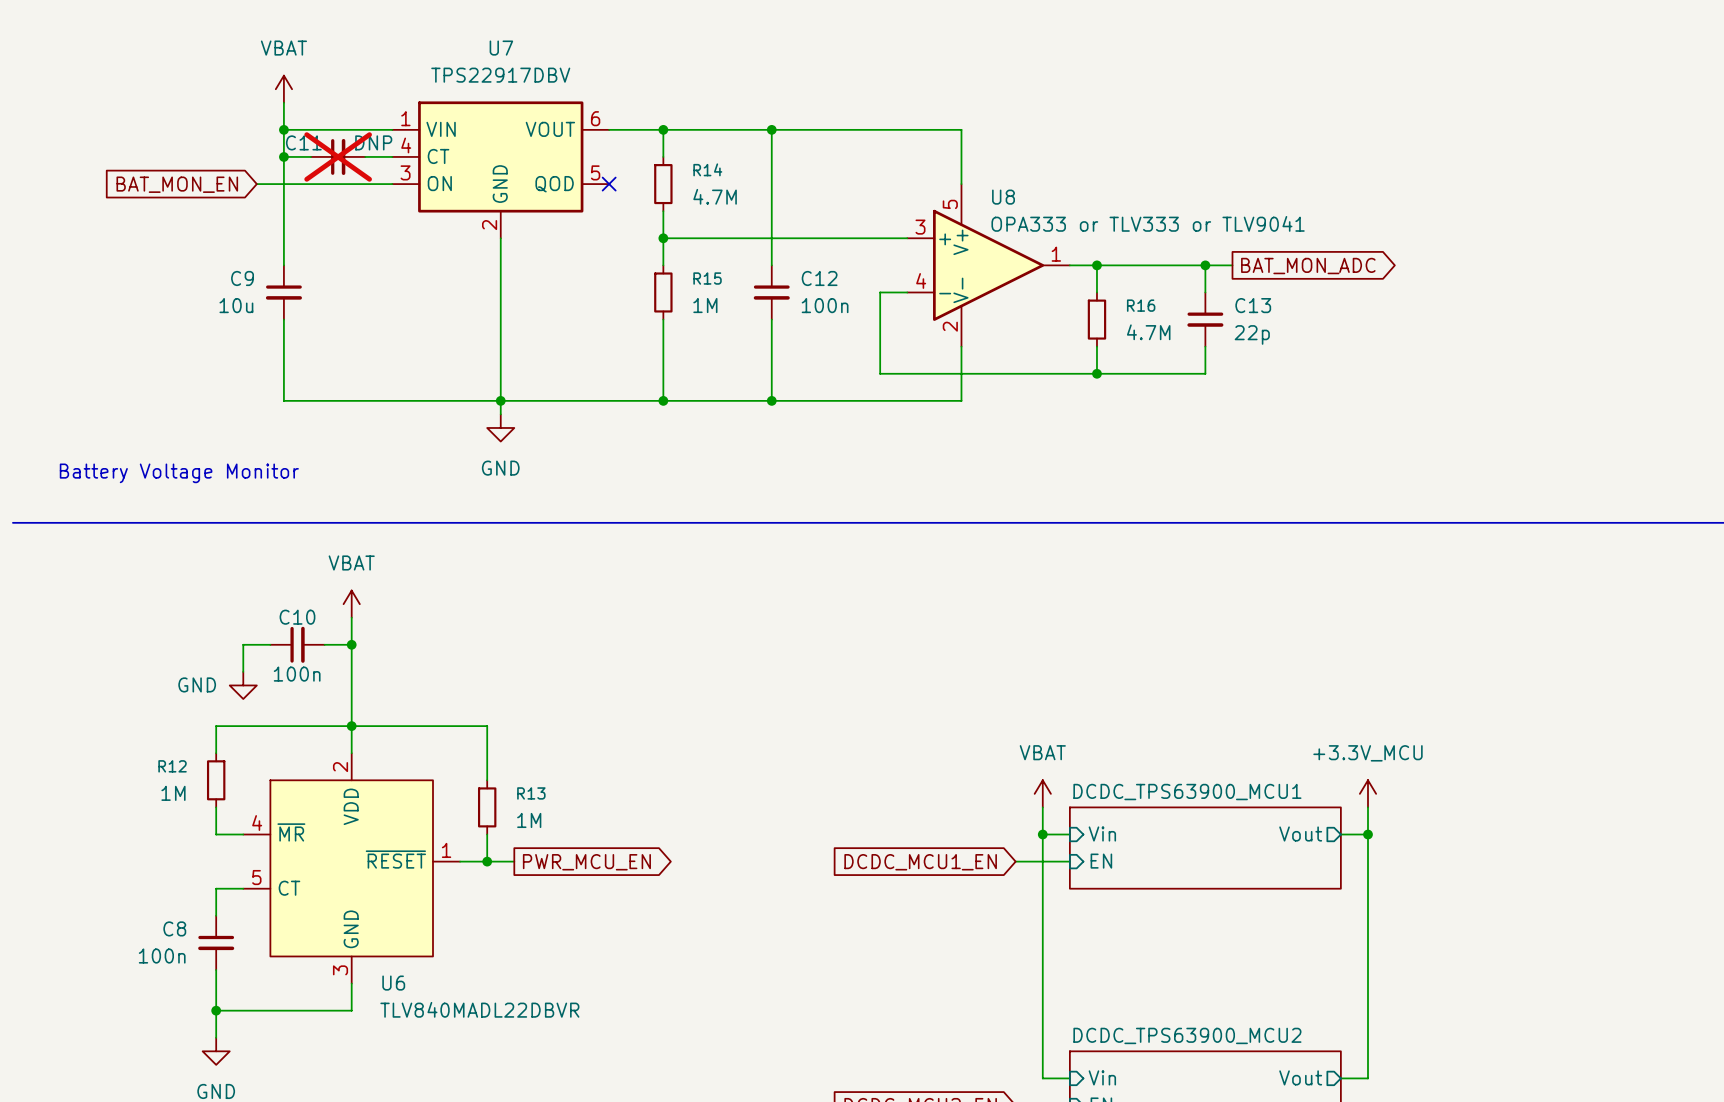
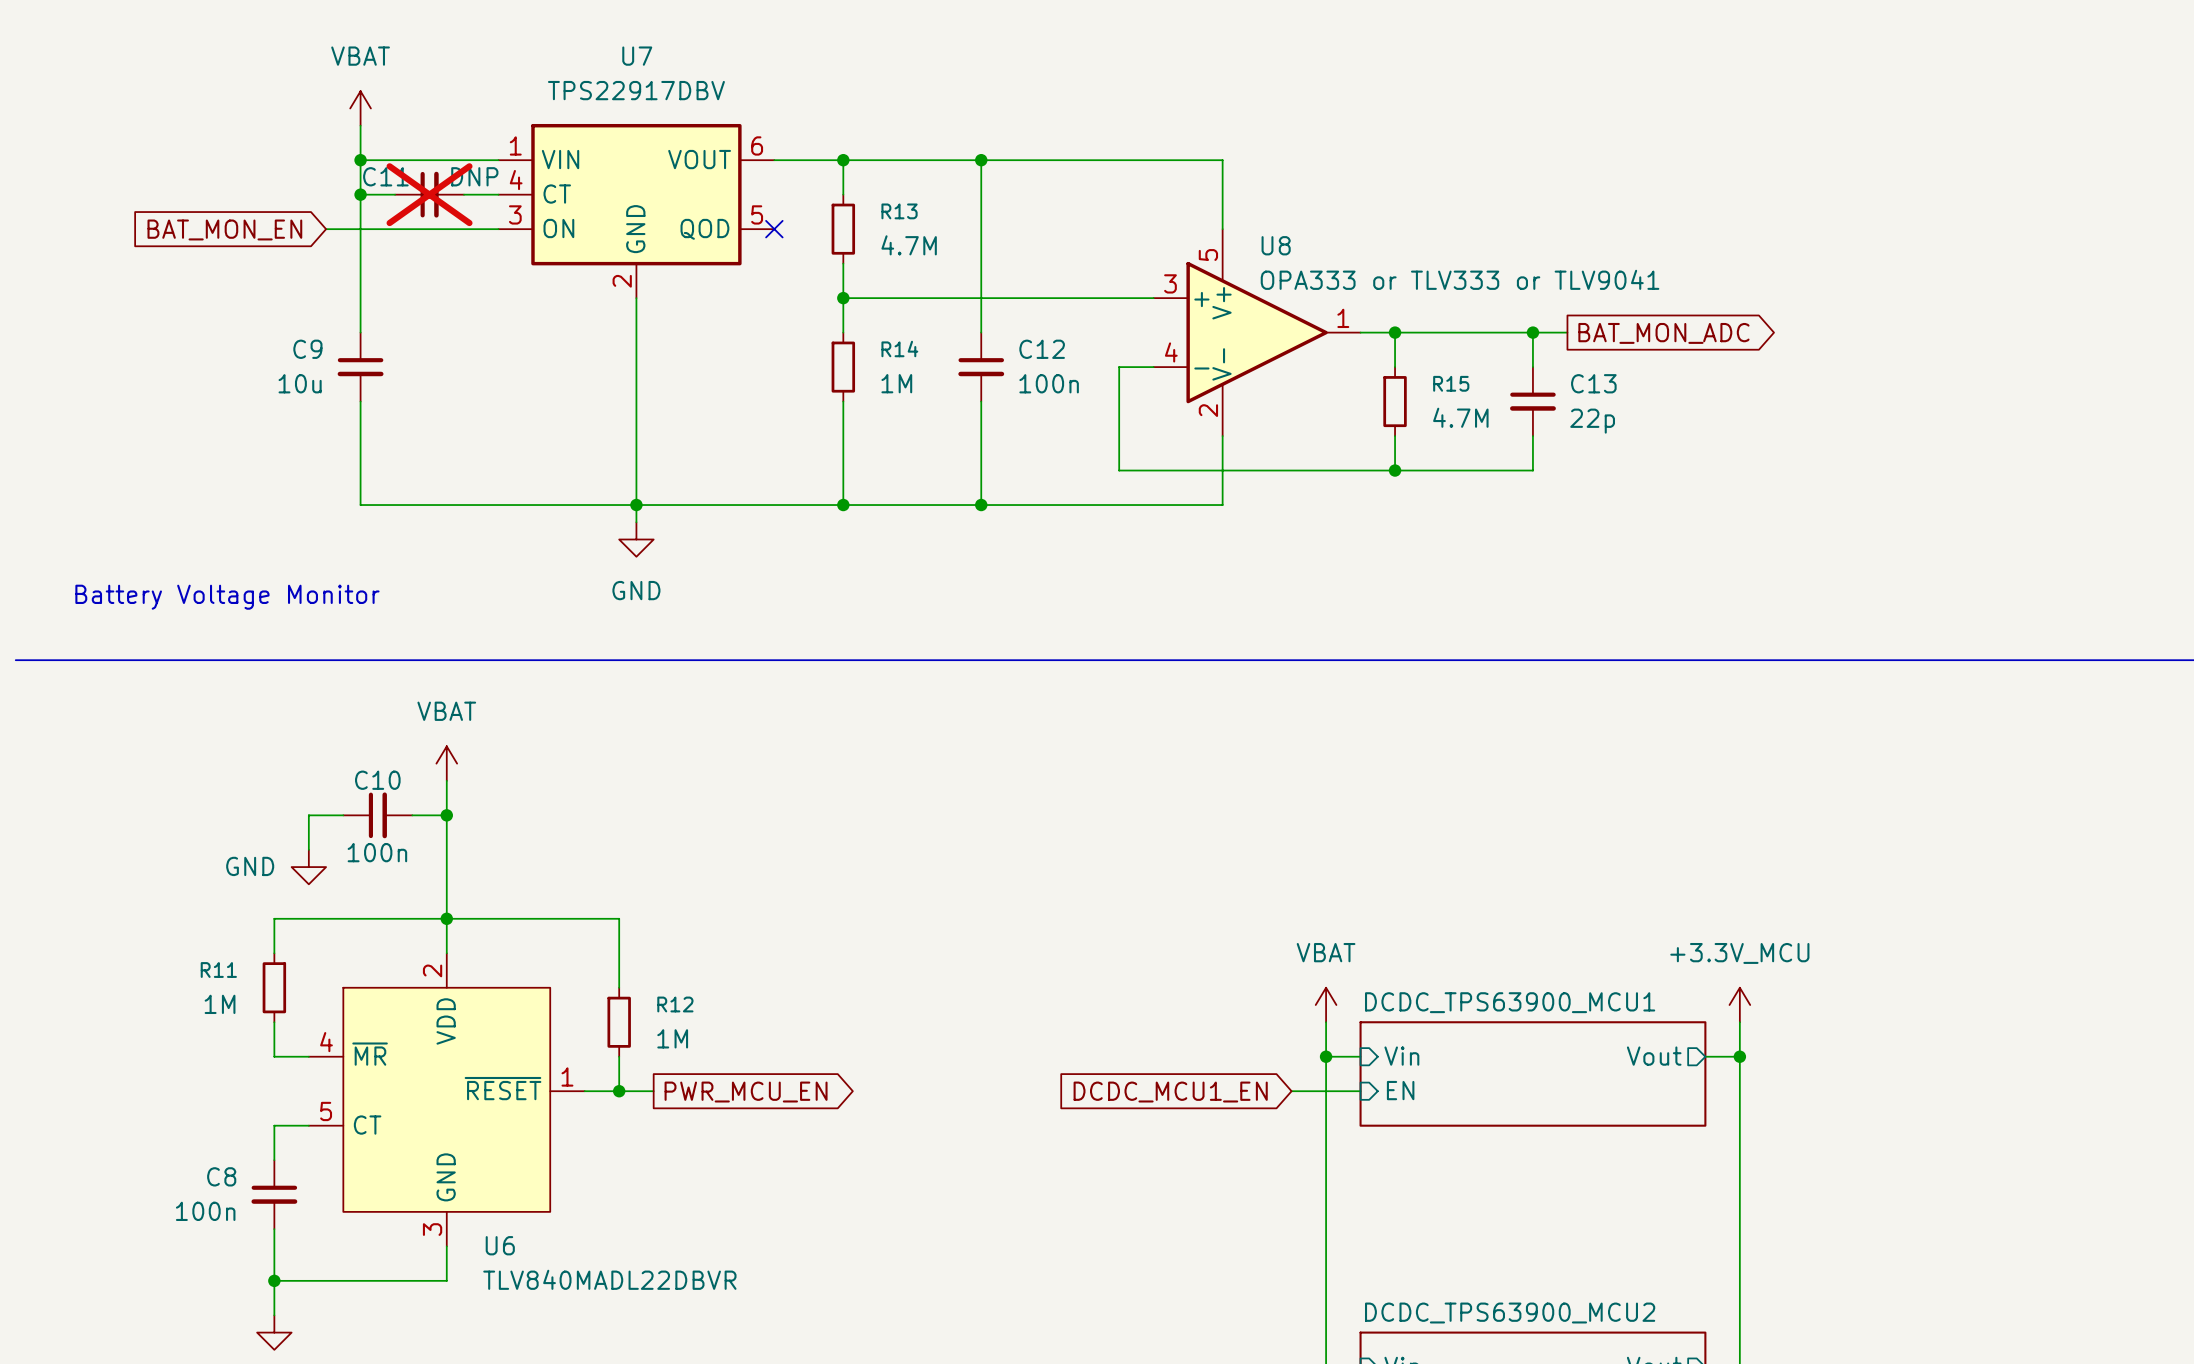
R14 name: R14 (707, 169) -> R13 (899, 211)
R15 name: R15 (707, 278) -> R14 (899, 349)
R16 name: R16 (1141, 305) -> R15 (1451, 383)
R12 name: R12 (172, 766) -> R11 (218, 970)
R13 name: R13 (531, 793) -> R12 (675, 1004)

